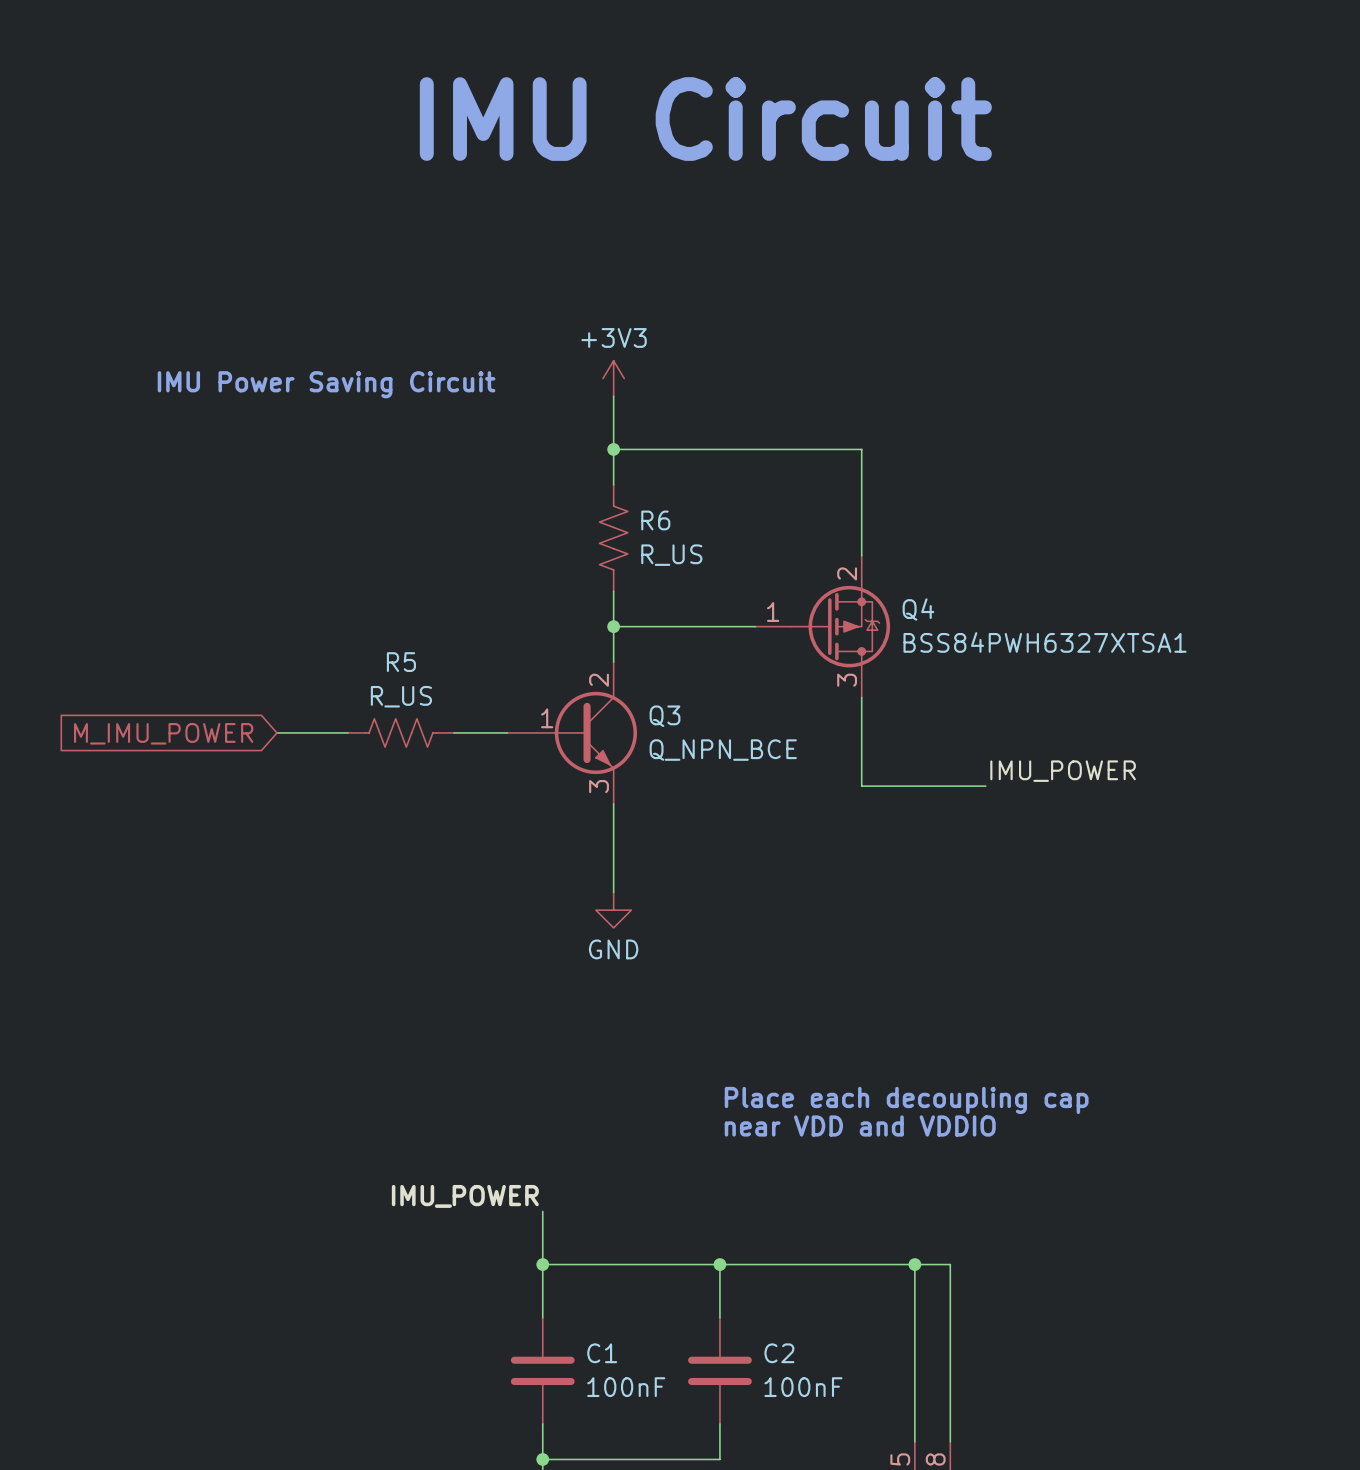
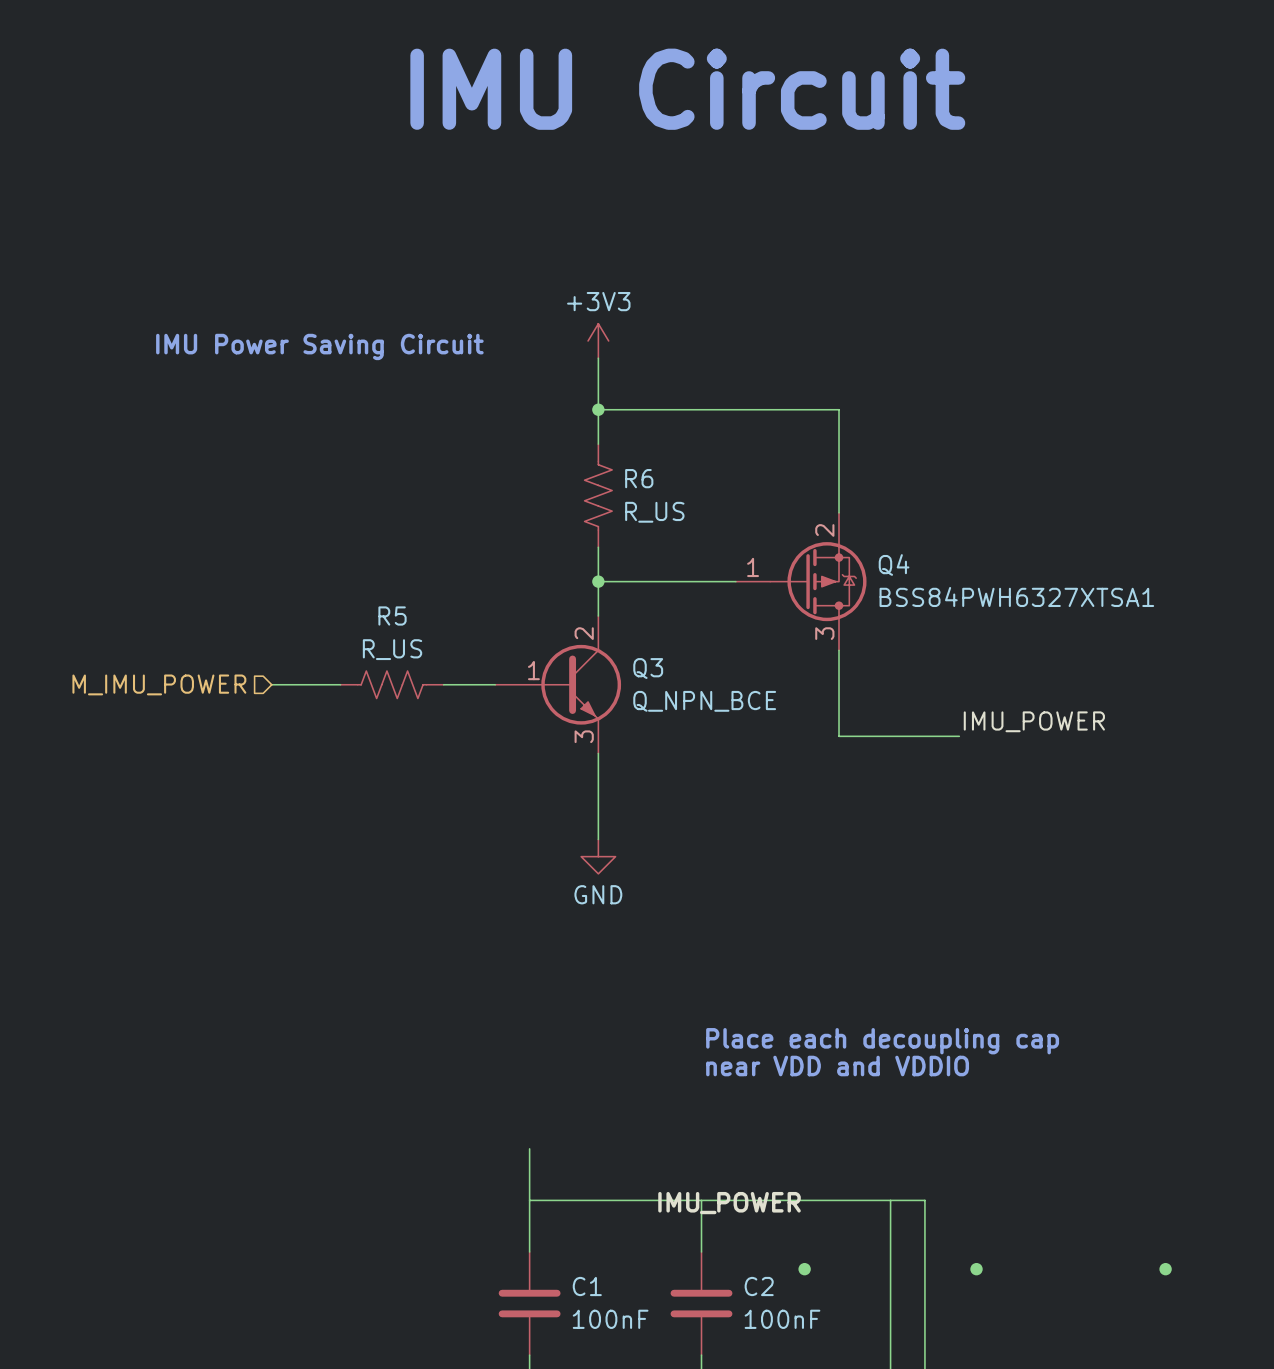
hierarchical label: none -> M_IMU_POWER (159, 684)
global label: M_IMU_POWER (163, 733) -> none
label position: IMU_POWER (465, 1196) -> IMU_POWER (729, 1203)
junction: (542, 1264) -> none
junction: (719, 1264) -> none
junction: (914, 1264) -> none
junction: none -> (804, 1269)
junction: none -> (976, 1269)
junction: none -> (1165, 1269)

